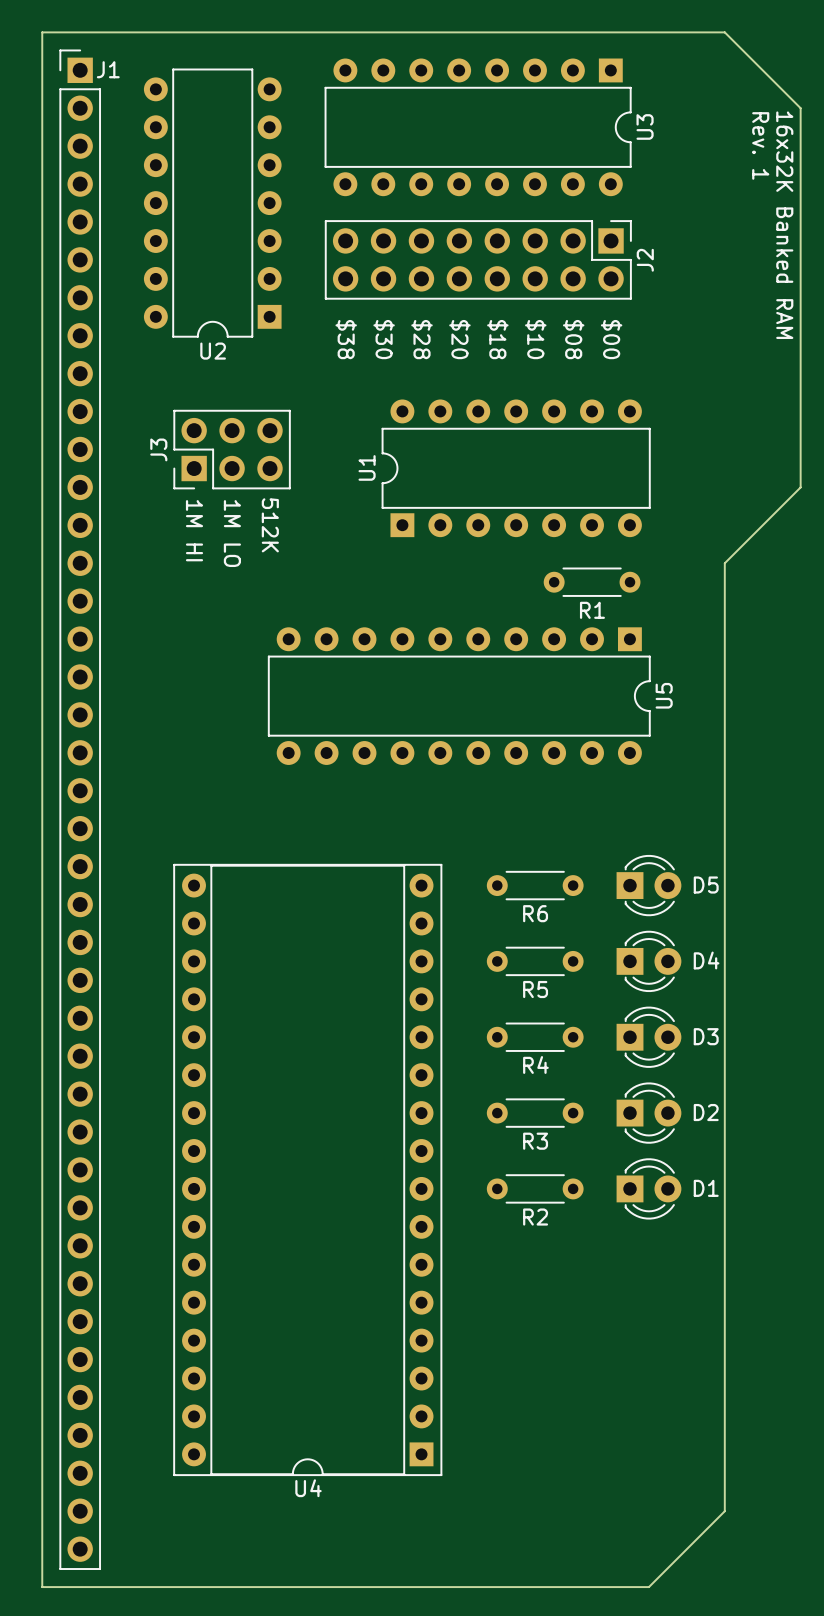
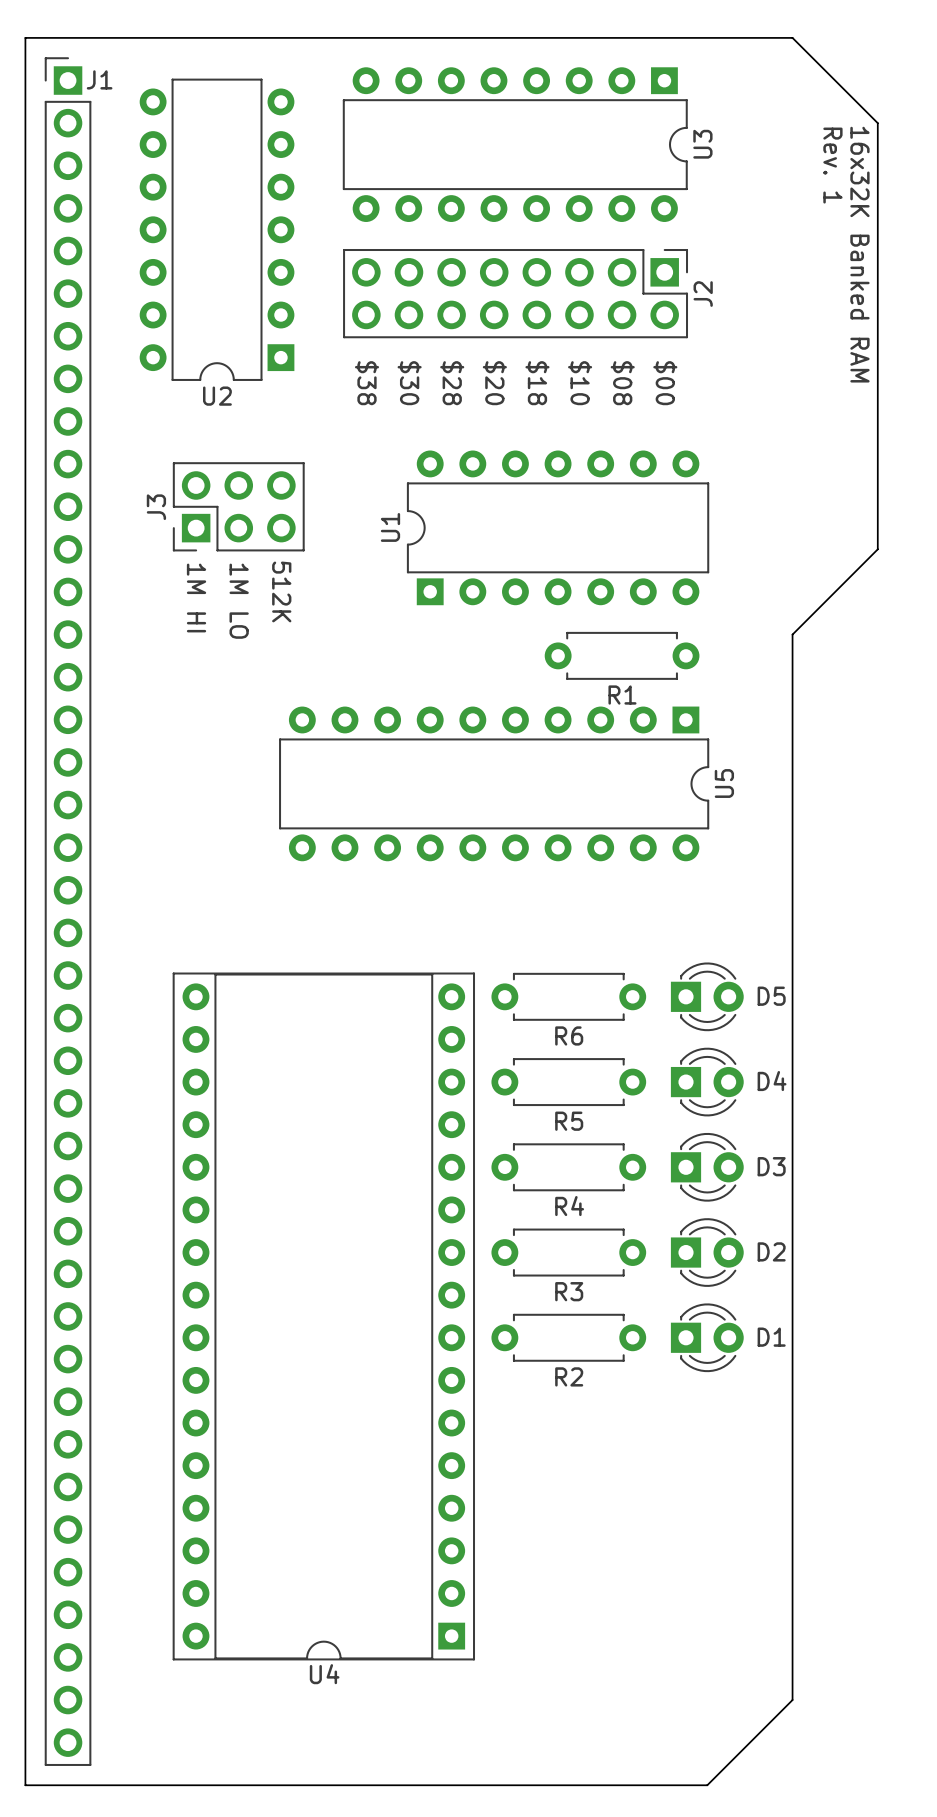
R1 footprint: [543, 567, 641, 597] -> [544, 631, 700, 680]
R6 footprint: [486, 870, 584, 901] -> [491, 972, 647, 1021]
R5 footprint: [486, 946, 584, 977] -> [491, 1058, 647, 1107]
R4 footprint: [486, 1022, 584, 1052] -> [491, 1143, 647, 1192]
R3 footprint: [486, 1098, 584, 1128] -> [491, 1228, 647, 1277]
R2 footprint: [486, 1174, 584, 1204] -> [491, 1313, 647, 1362]

